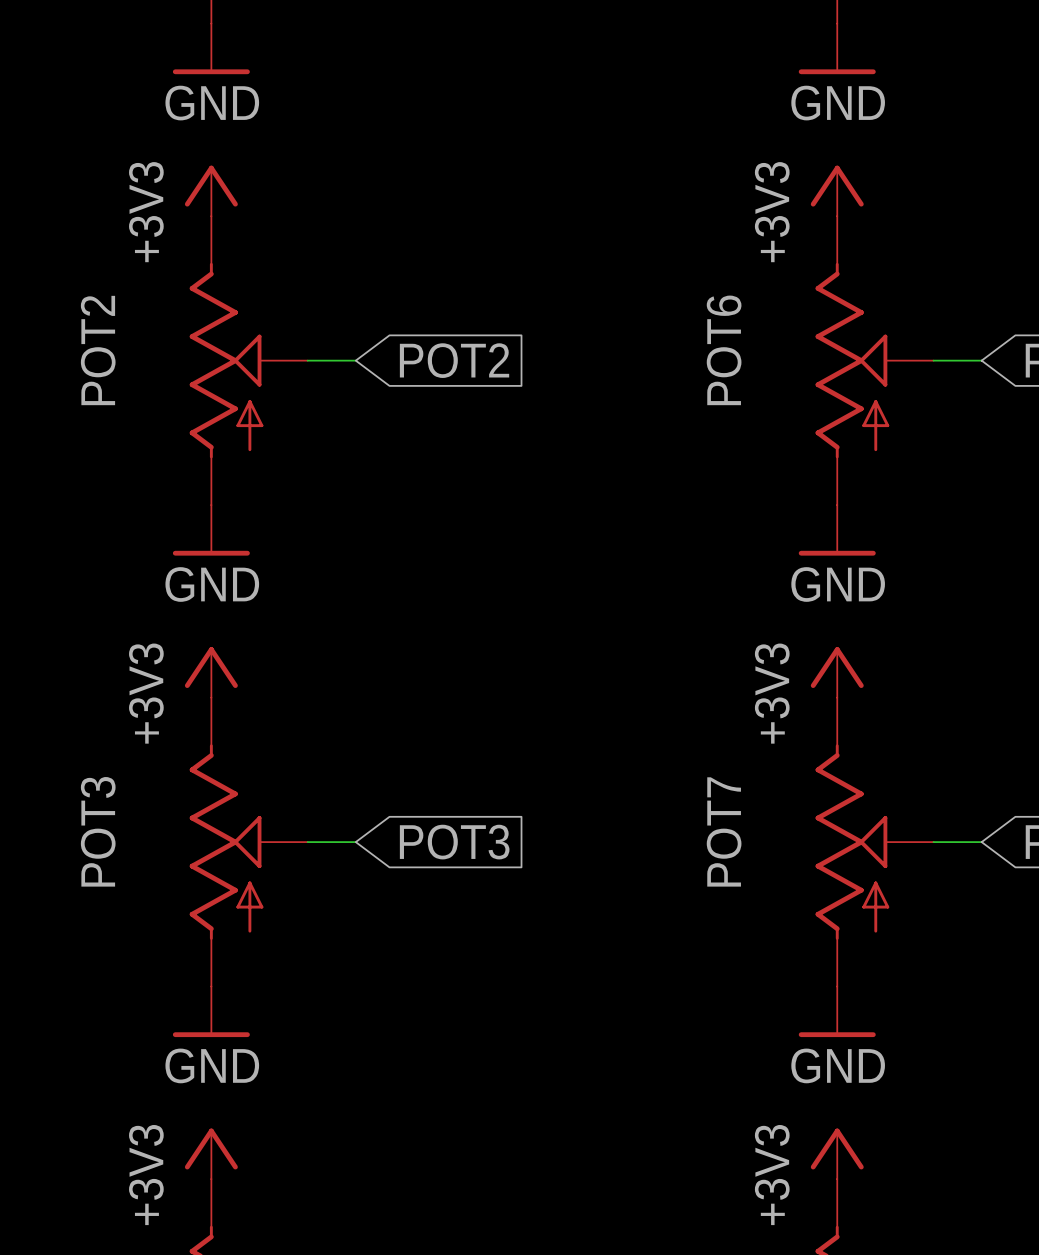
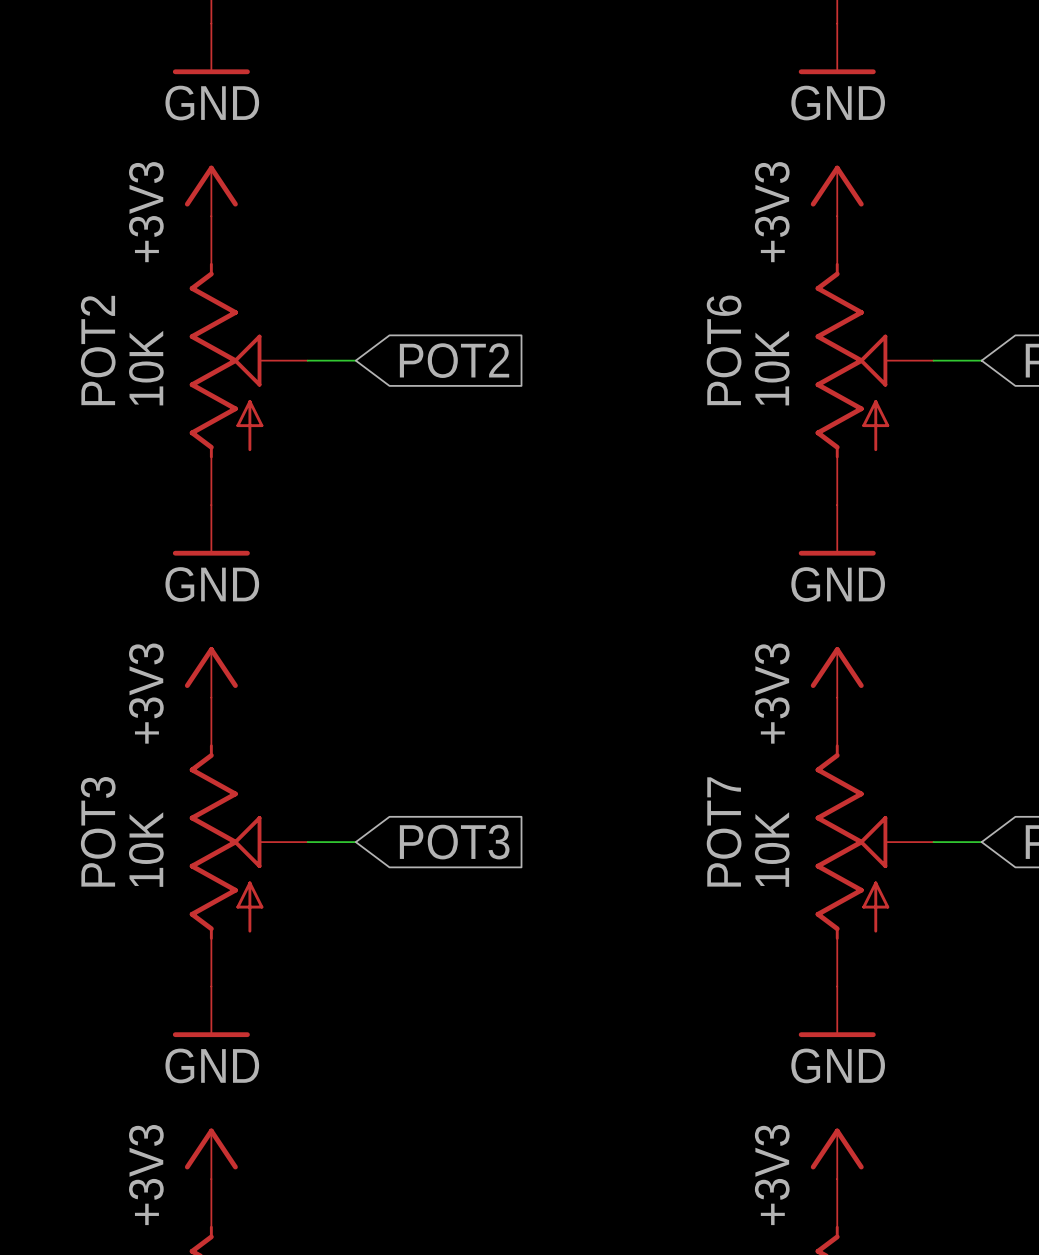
POT2 value: none -> 10K (146, 368)
POT6 value: none -> 10K (772, 368)
POT3 value: none -> 10K (146, 849)
POT7 value: none -> 10K (772, 849)

